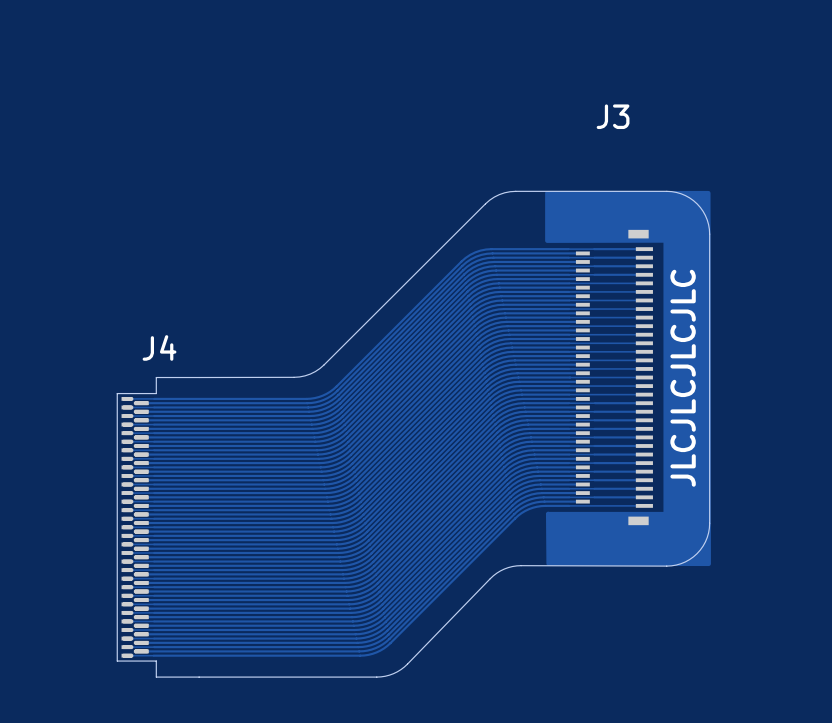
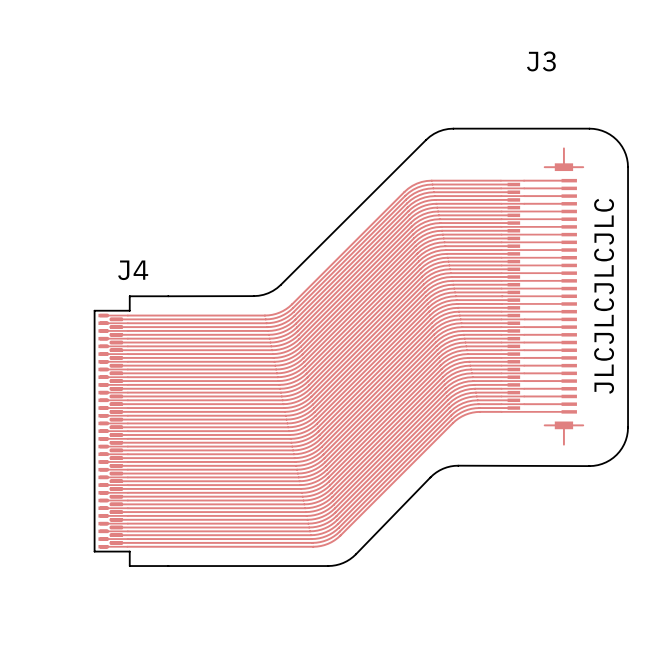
drawing: [545, 190, 711, 567] -> none
track: none -> (563, 148) (563, 165)
track: none -> (544, 167) (583, 167)
track: none -> (544, 425) (583, 425)
track: none -> (563, 425) (563, 444)

